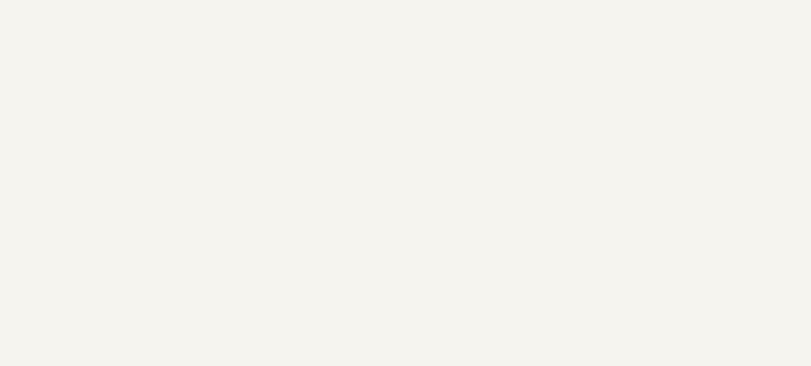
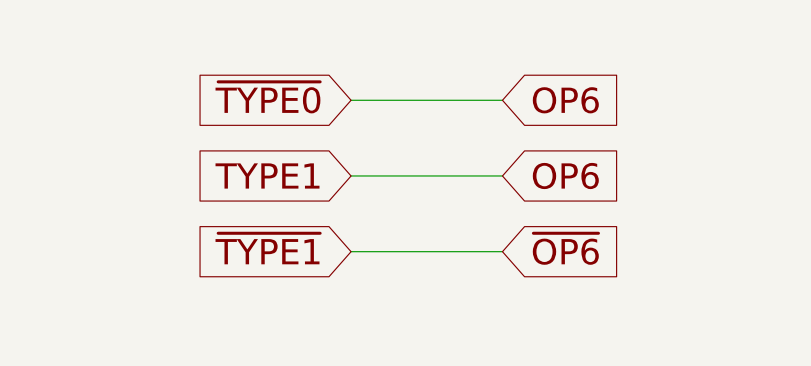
global label: none -> ~{TYPE0} (267, 97)
wire: none -> (351, 100) (502, 100)
global label: none -> OP6 (565, 100)
global label: none -> TYPE1 (267, 175)
wire: none -> (351, 175) (502, 175)
global label: none -> OP6 (565, 176)
global label: none -> ~{TYPE1} (267, 248)
global label: none -> ~{OP6} (565, 249)
wire: none -> (351, 251) (502, 251)

